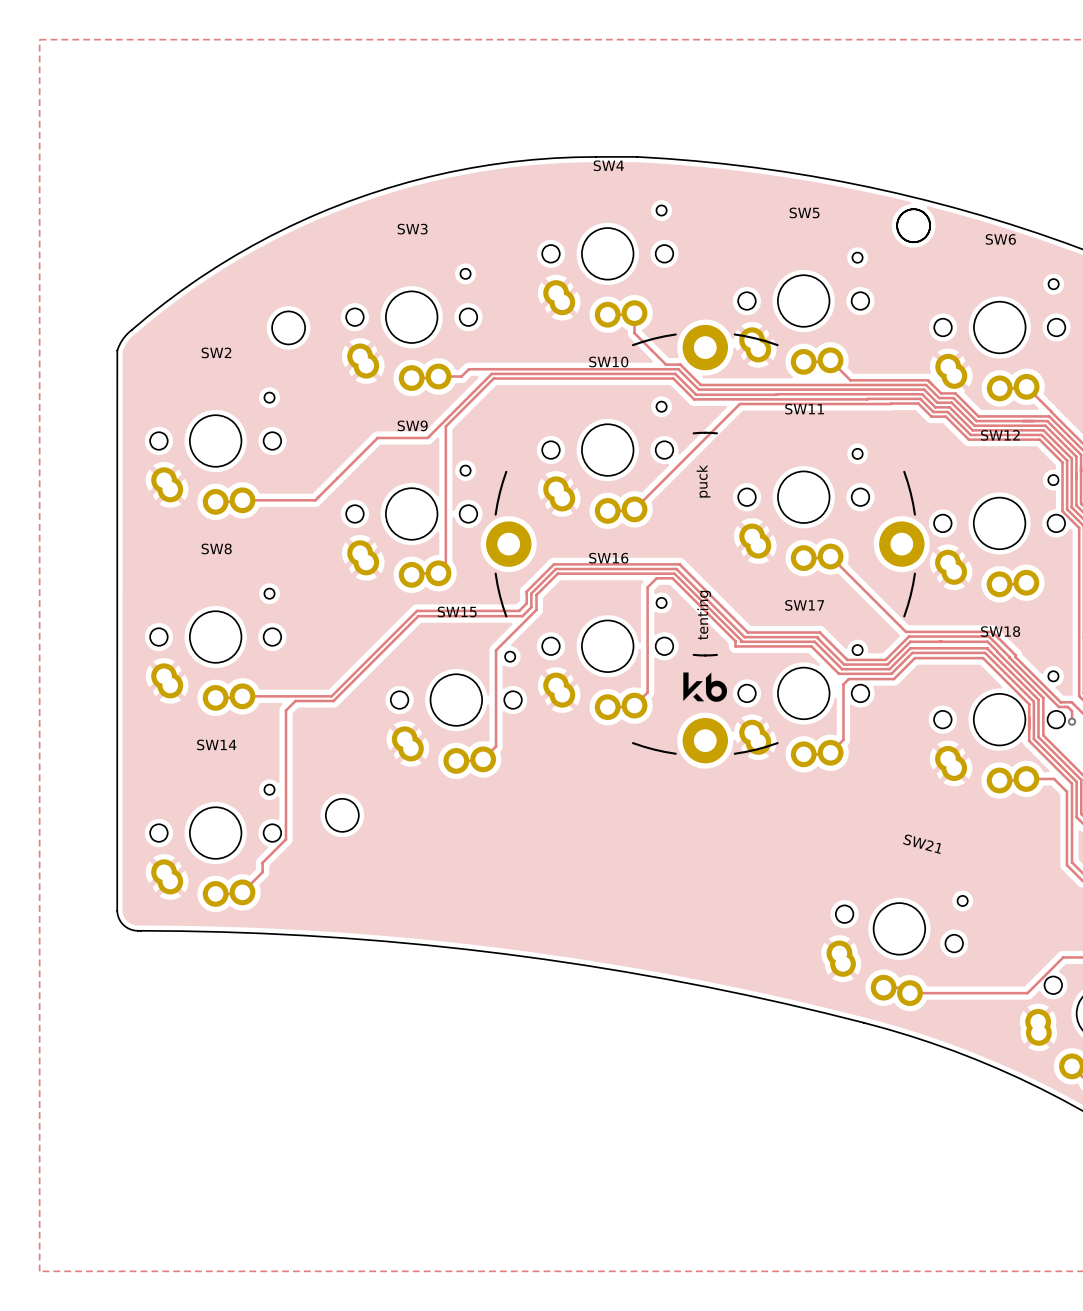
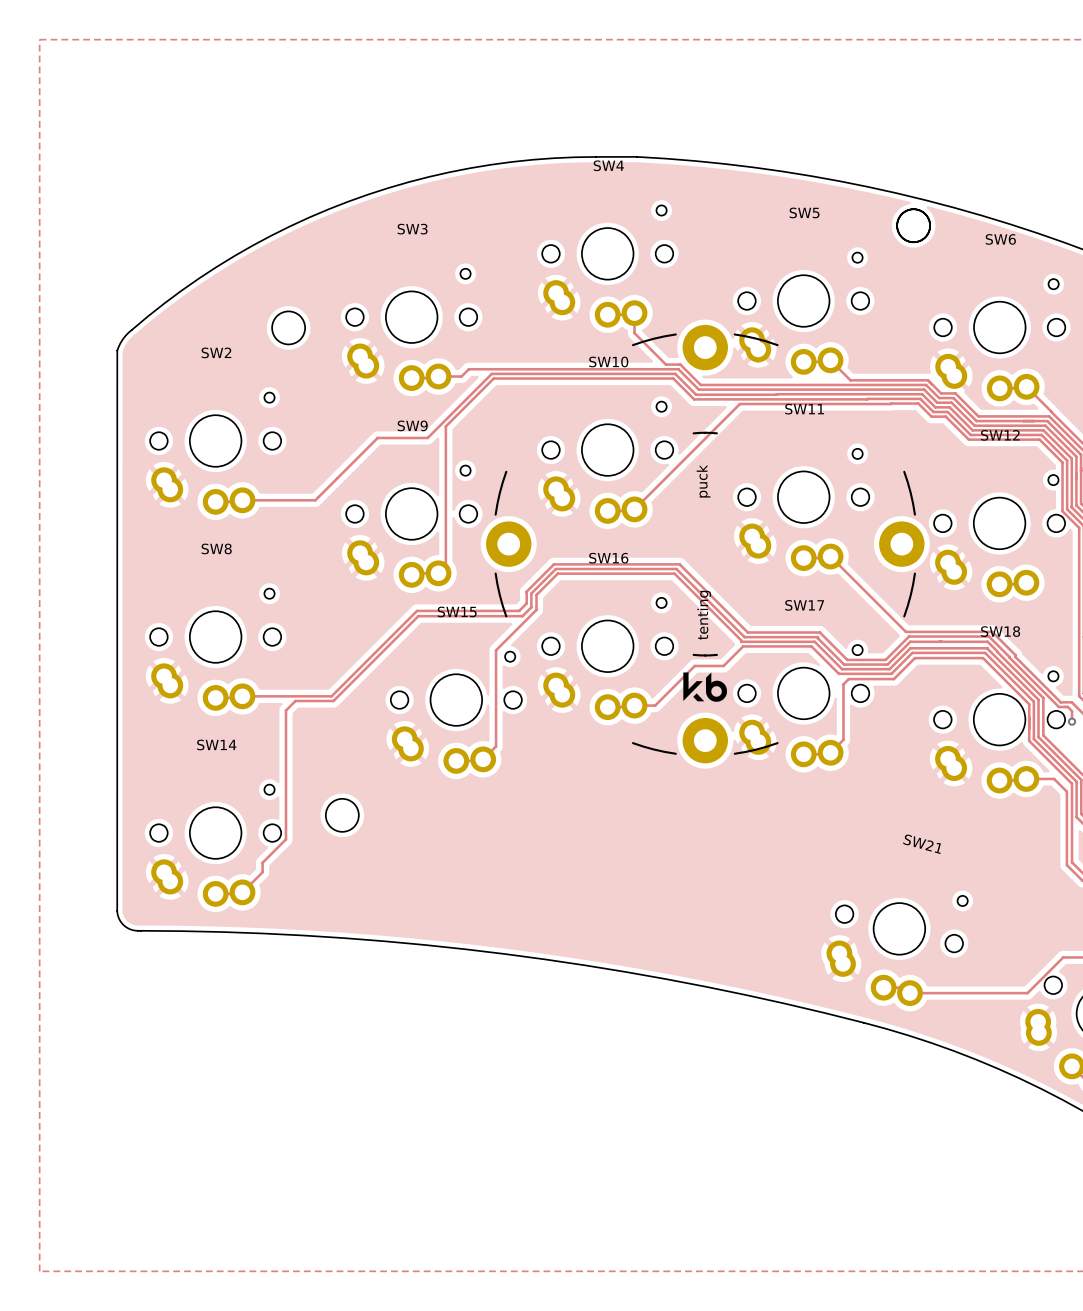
track: (743, 646) (735, 646) (735, 641) (672, 578) (656, 578) (647, 587) (647, 692) (634, 705) -> (743, 646) (723, 665) (694, 665) (655, 705) (634, 705)

